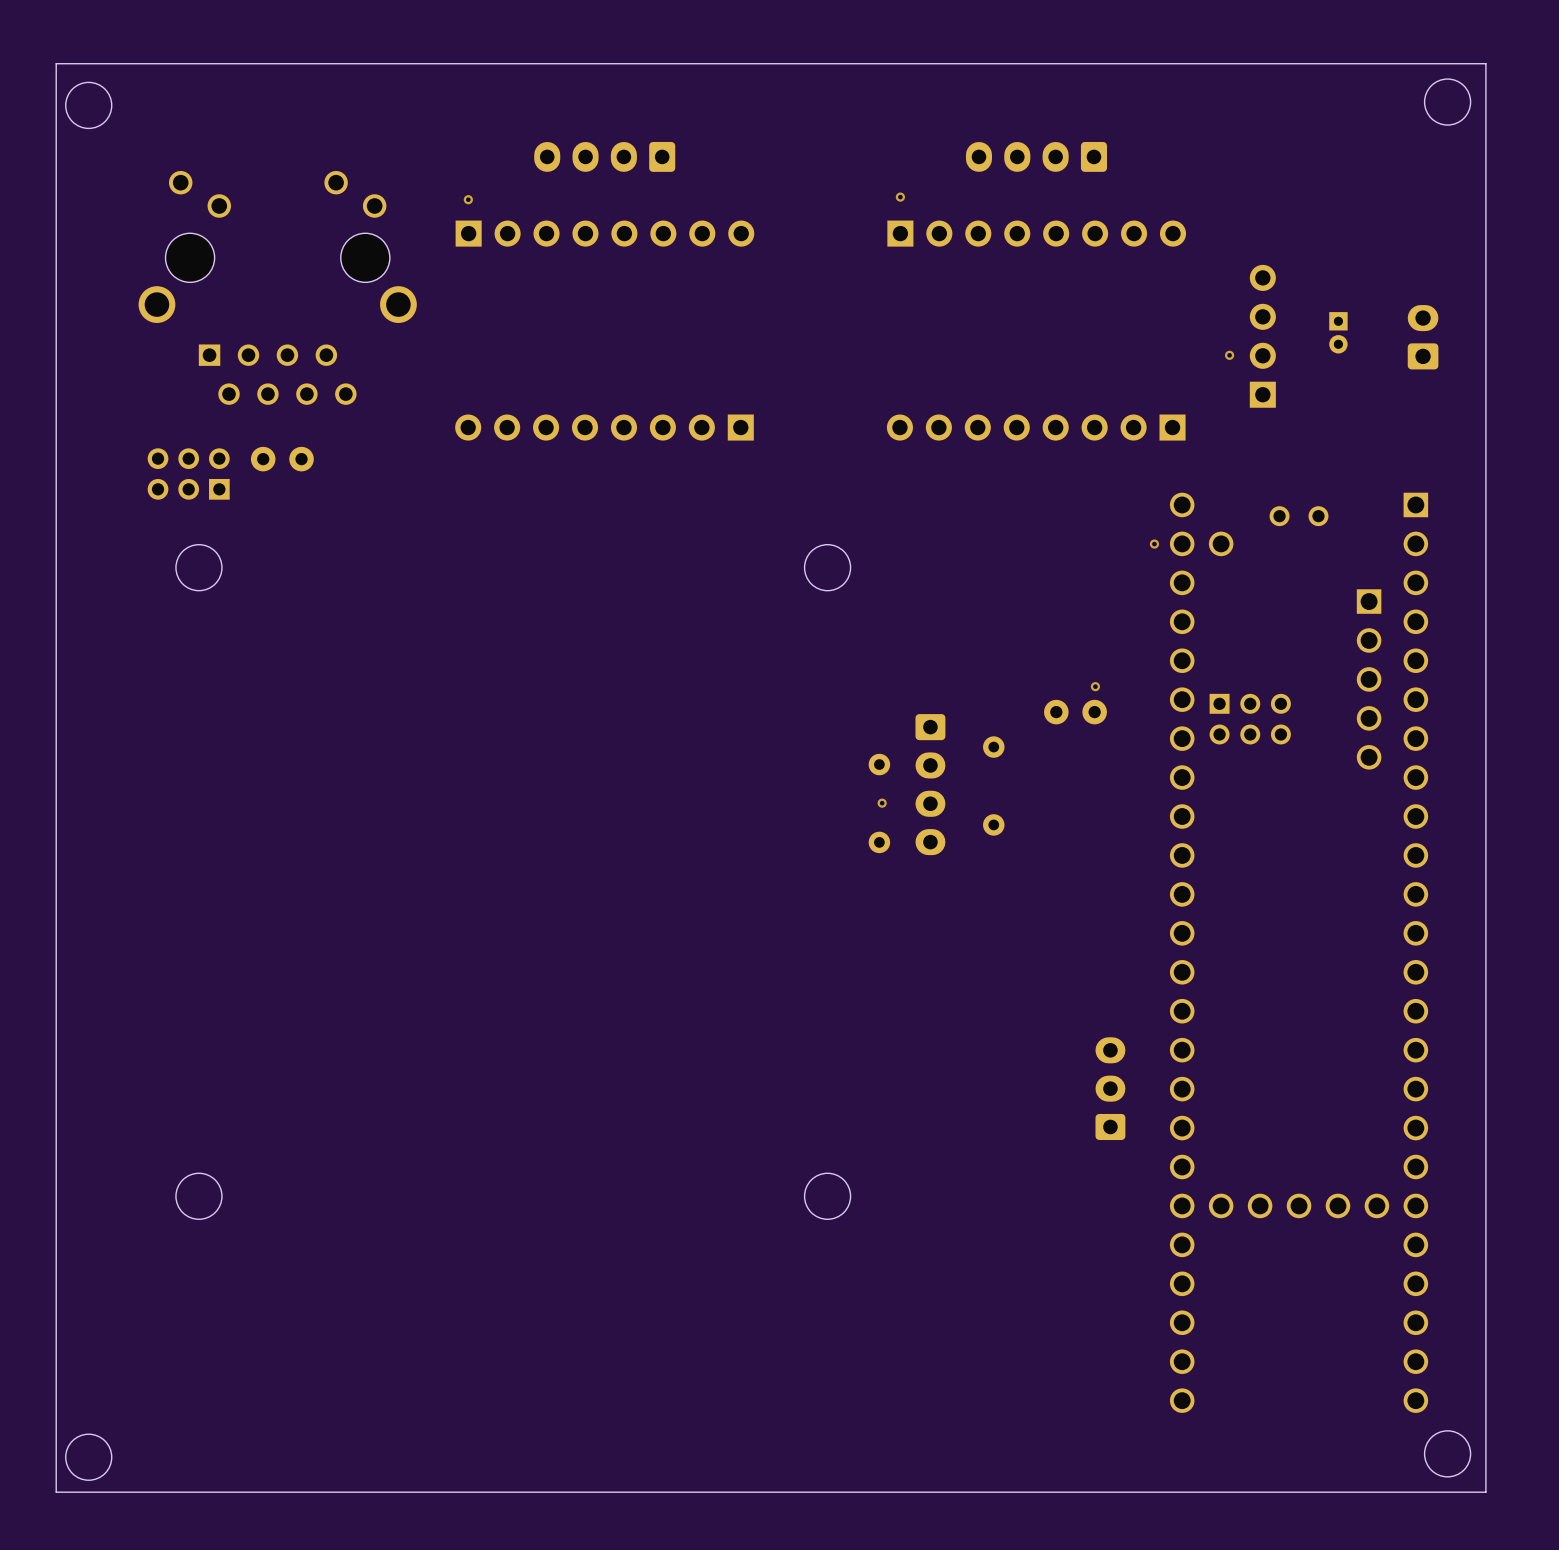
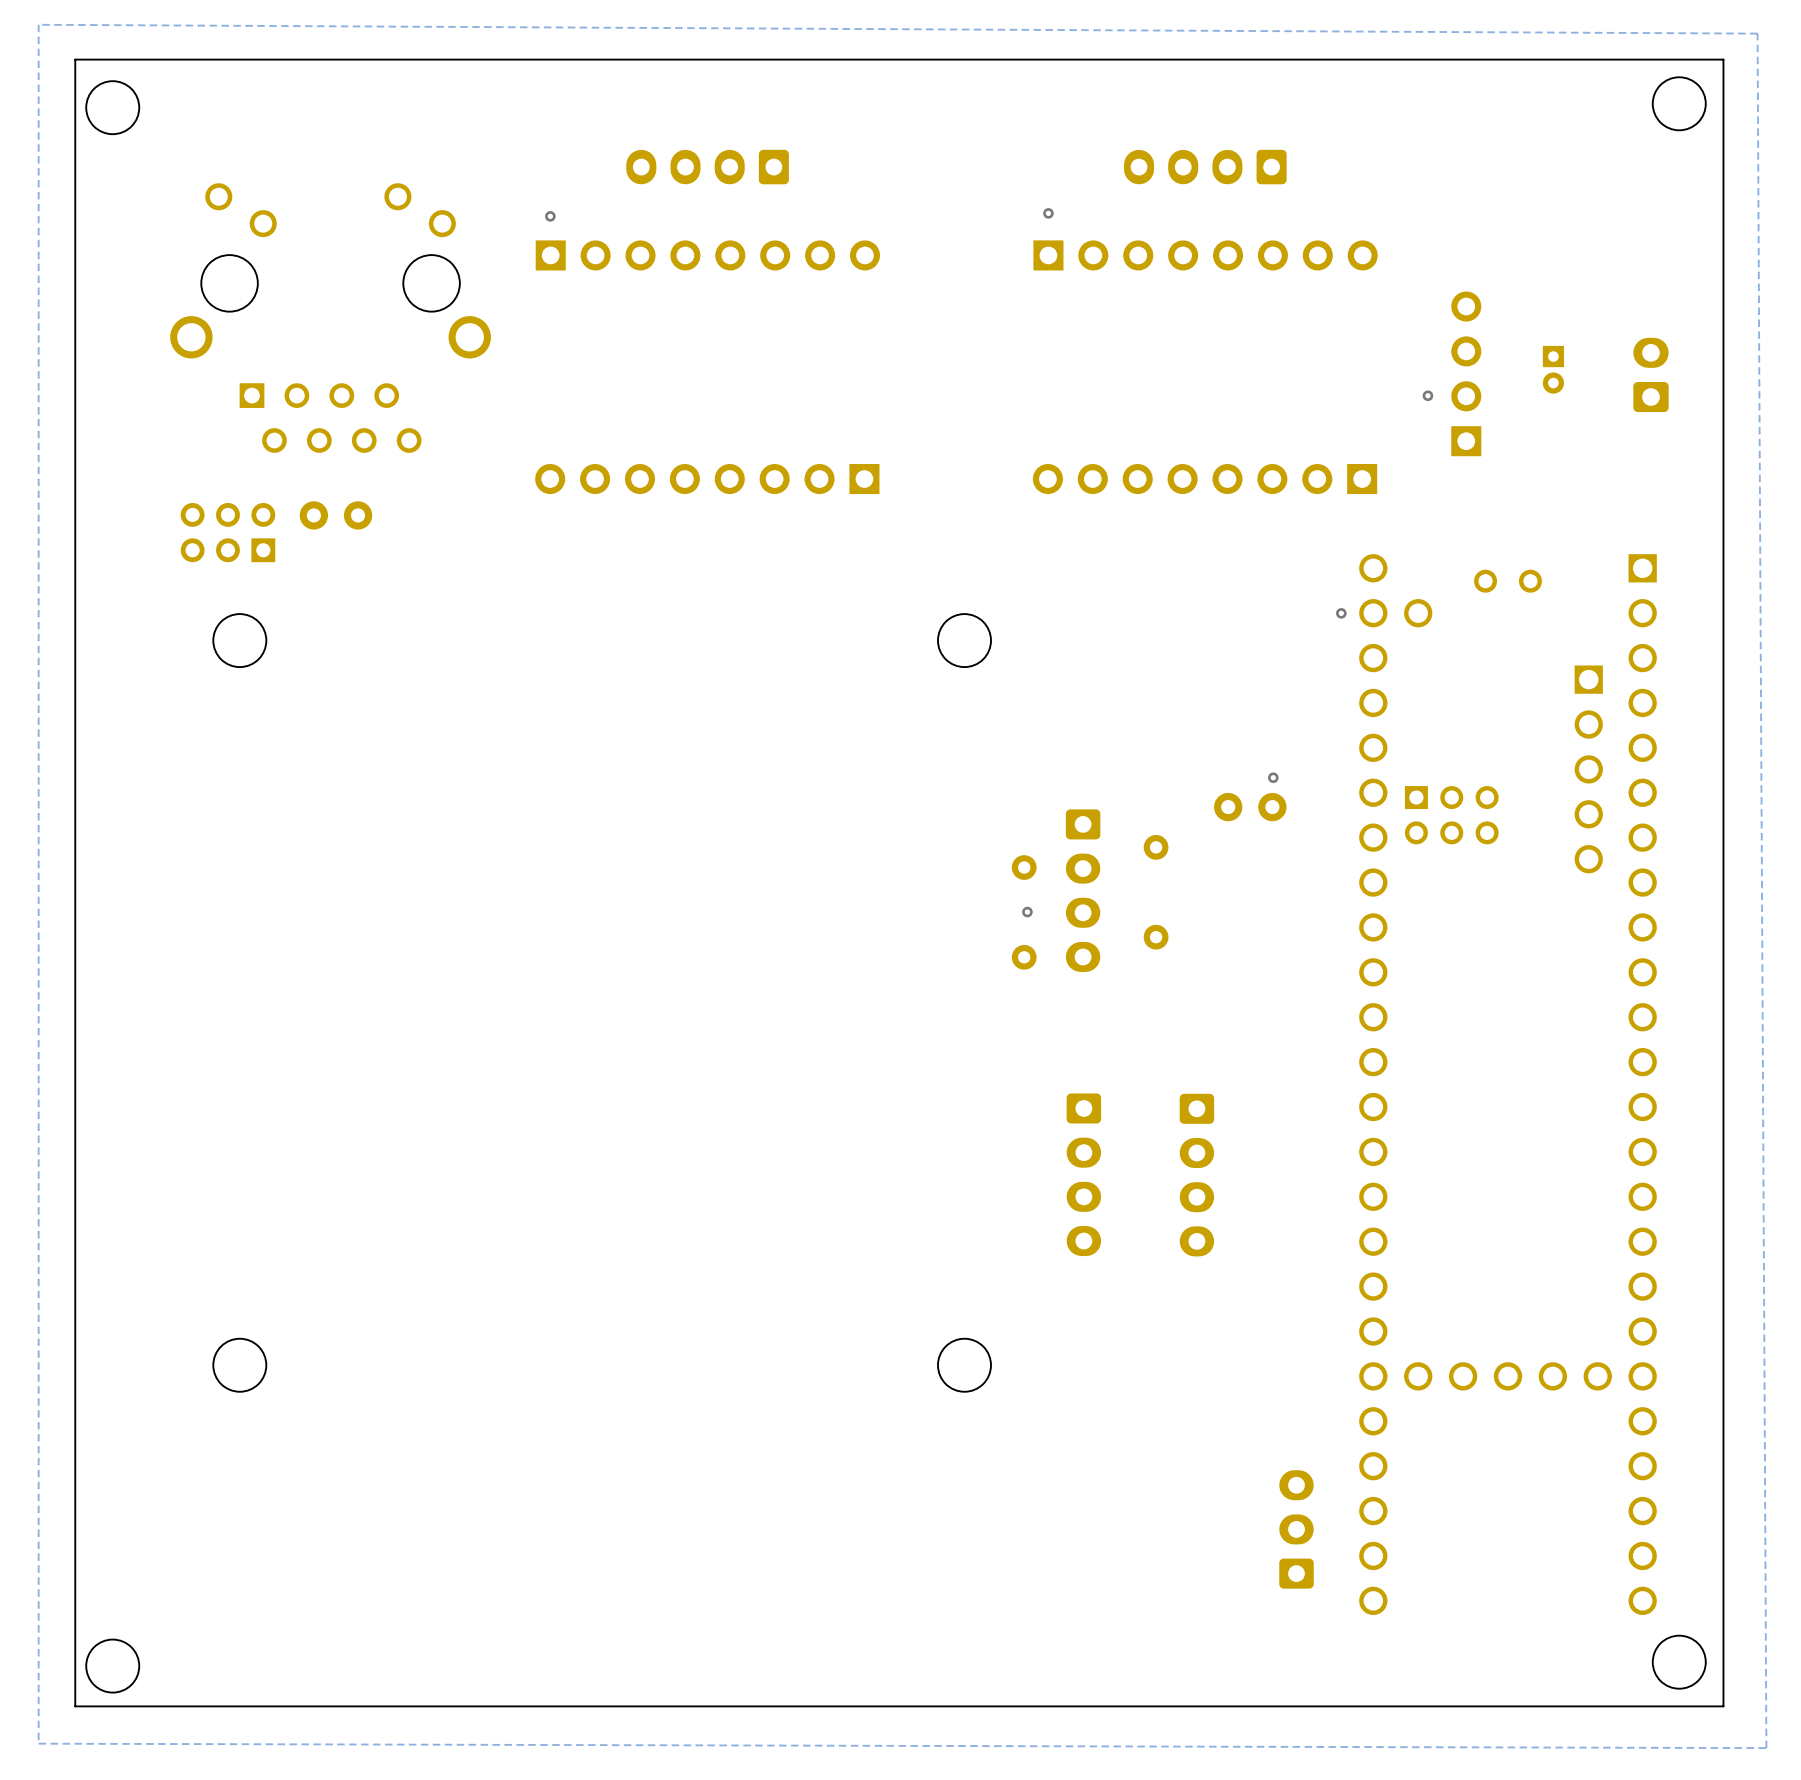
zone outline: none -> (38, 24) (1757, 33) (1766, 1748) (38, 1743) (38, 24)
part: none -> (1083, 1174)
part: none -> (1196, 1175)
part position: (1110, 1088) -> (1296, 1529)

